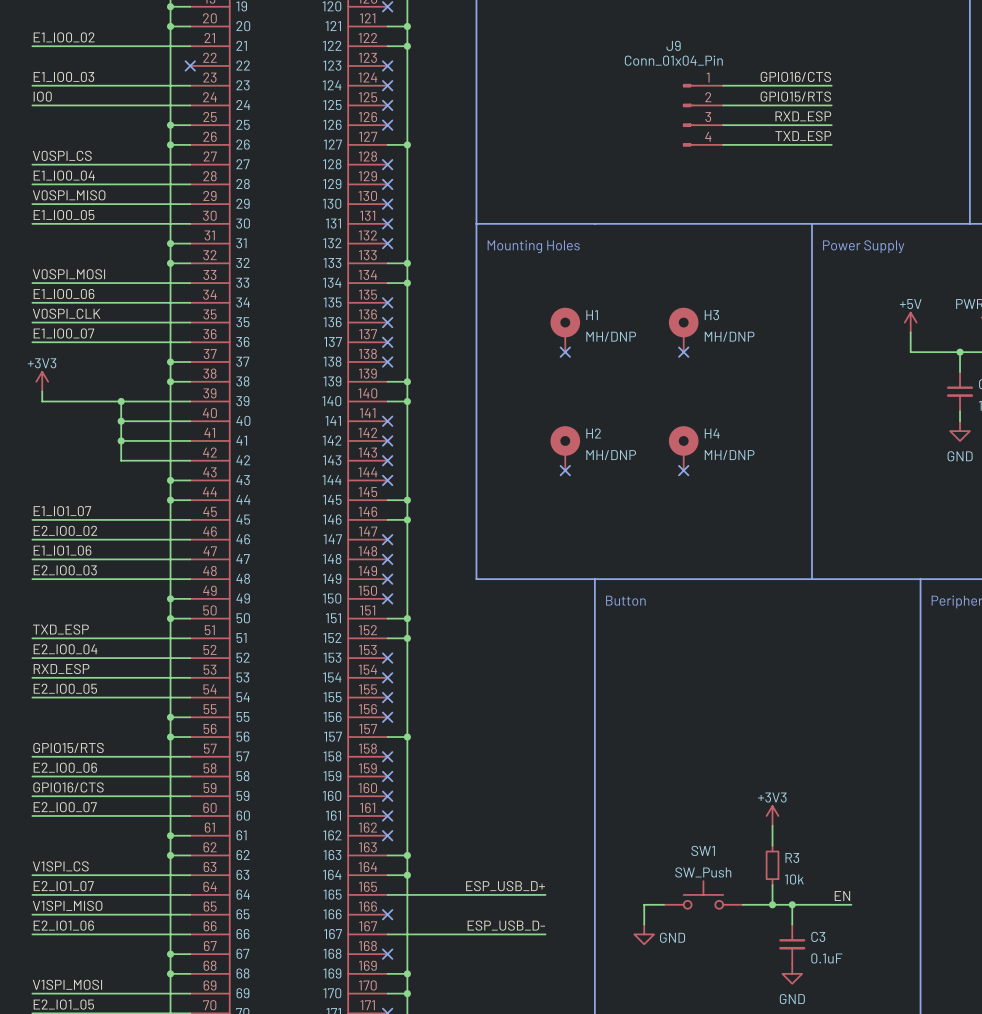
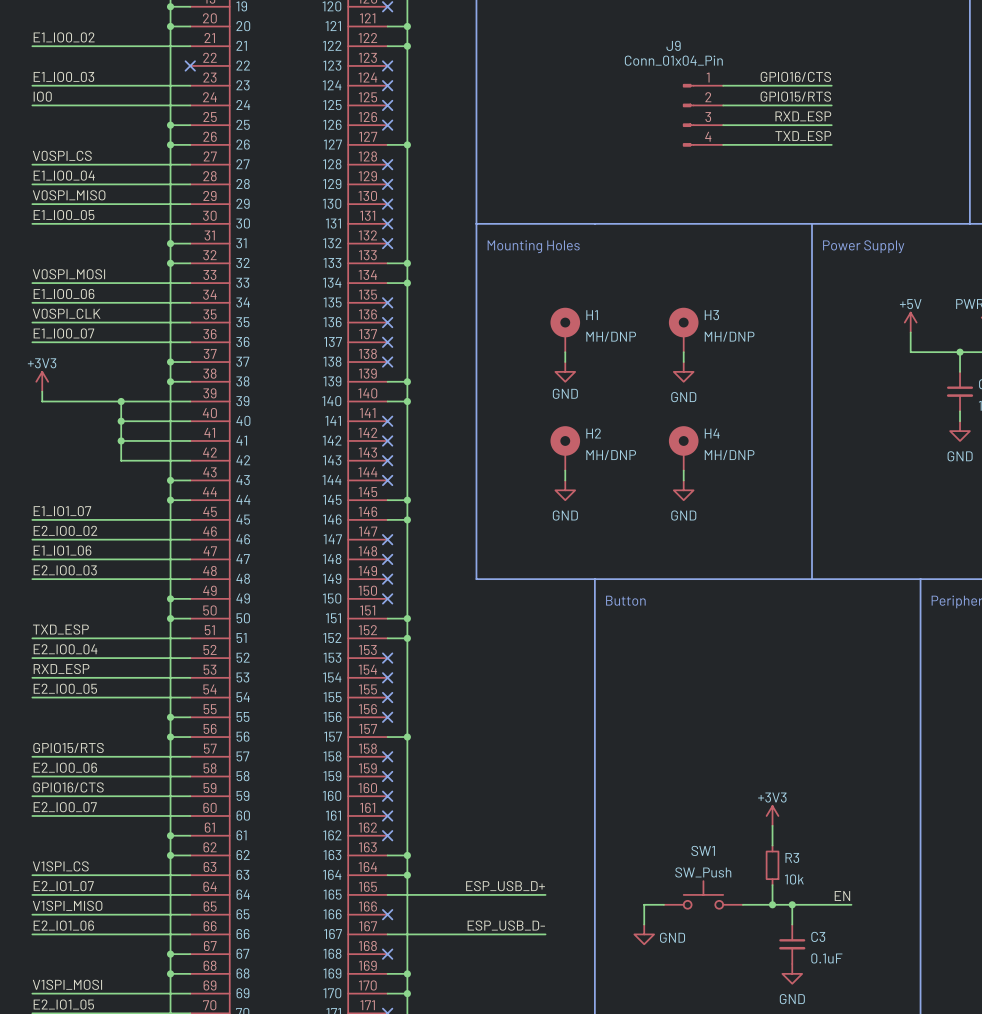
wire: none -> (565, 352) (565, 362)
no-connect mark: (565, 352) -> none
wire: none -> (683, 352) (683, 362)
no-connect mark: (683, 352) -> none
power symbol: none -> GND (565, 371)
power symbol: none -> GND (683, 371)
wire: none -> (565, 470) (565, 480)
no-connect mark: (565, 470) -> none
wire: none -> (683, 470) (683, 480)
no-connect mark: (683, 470) -> none
power symbol: none -> GND (565, 490)
power symbol: none -> GND (683, 490)

